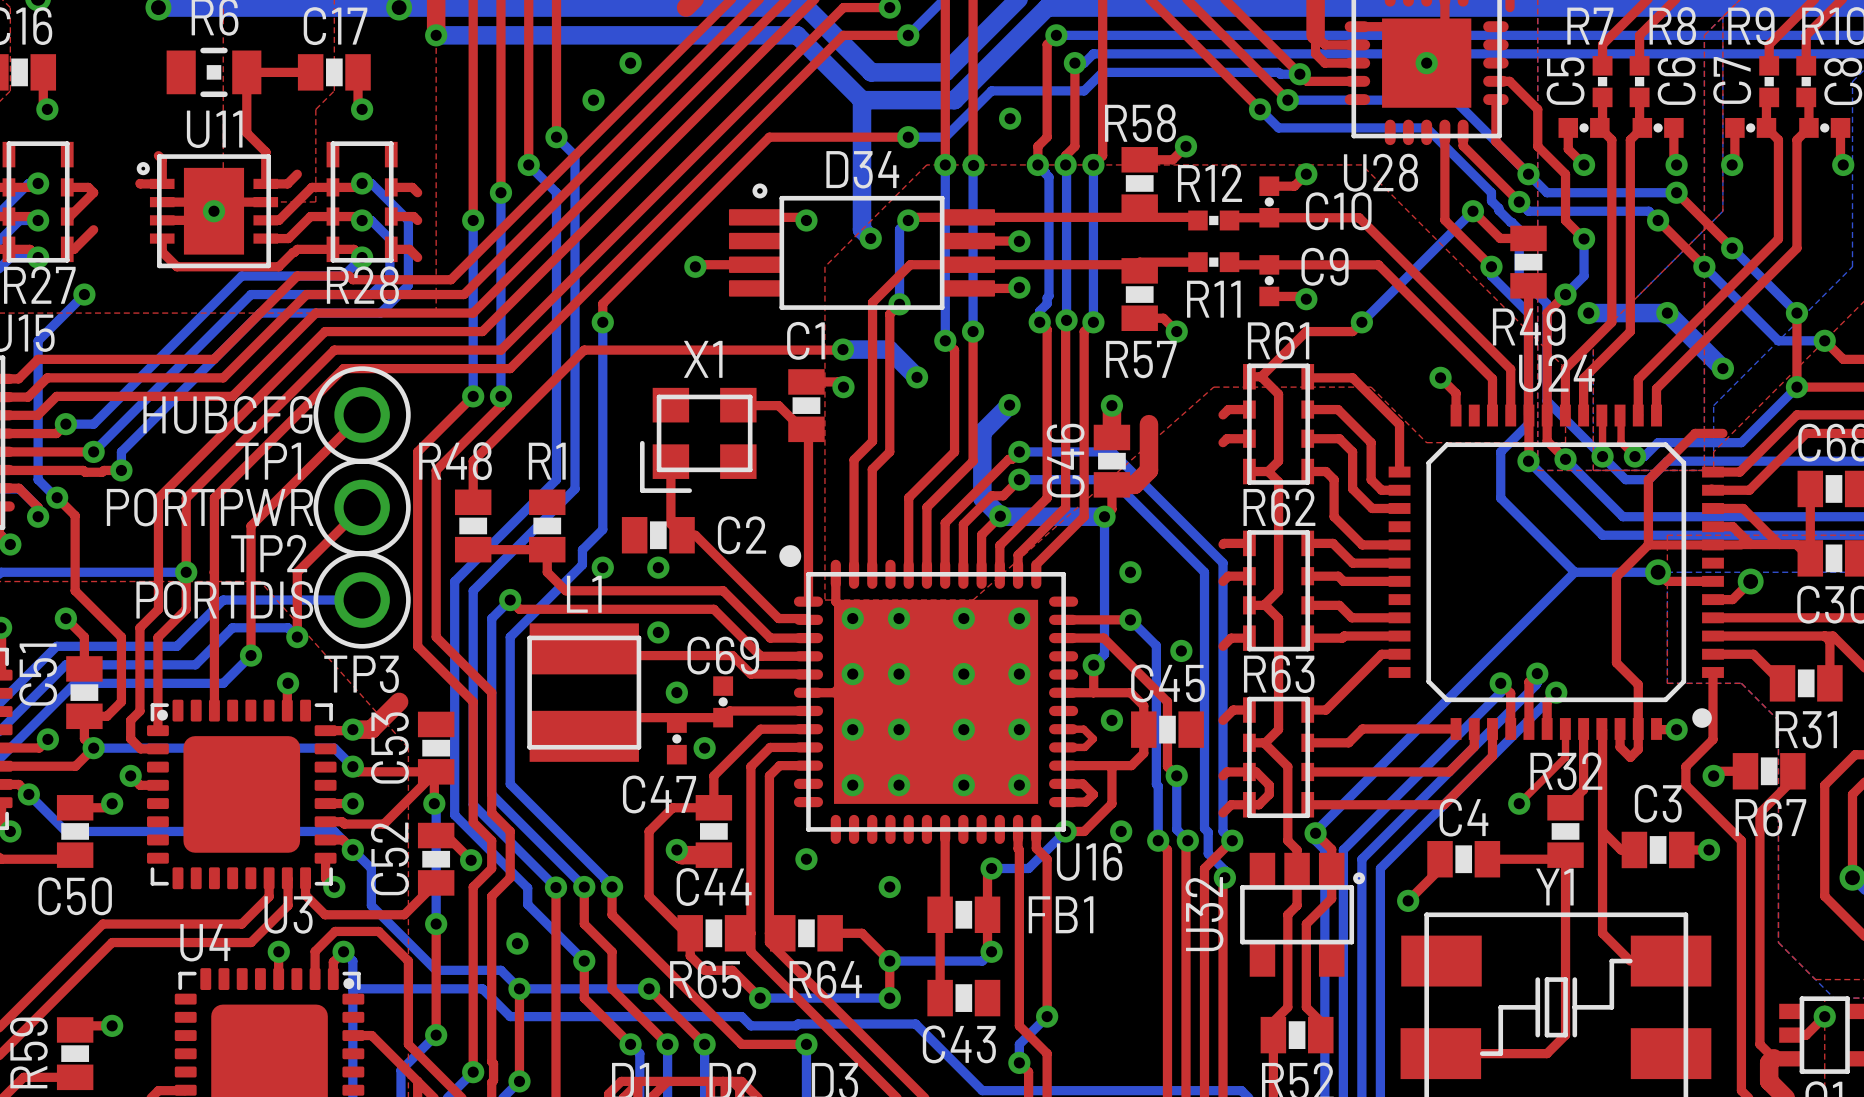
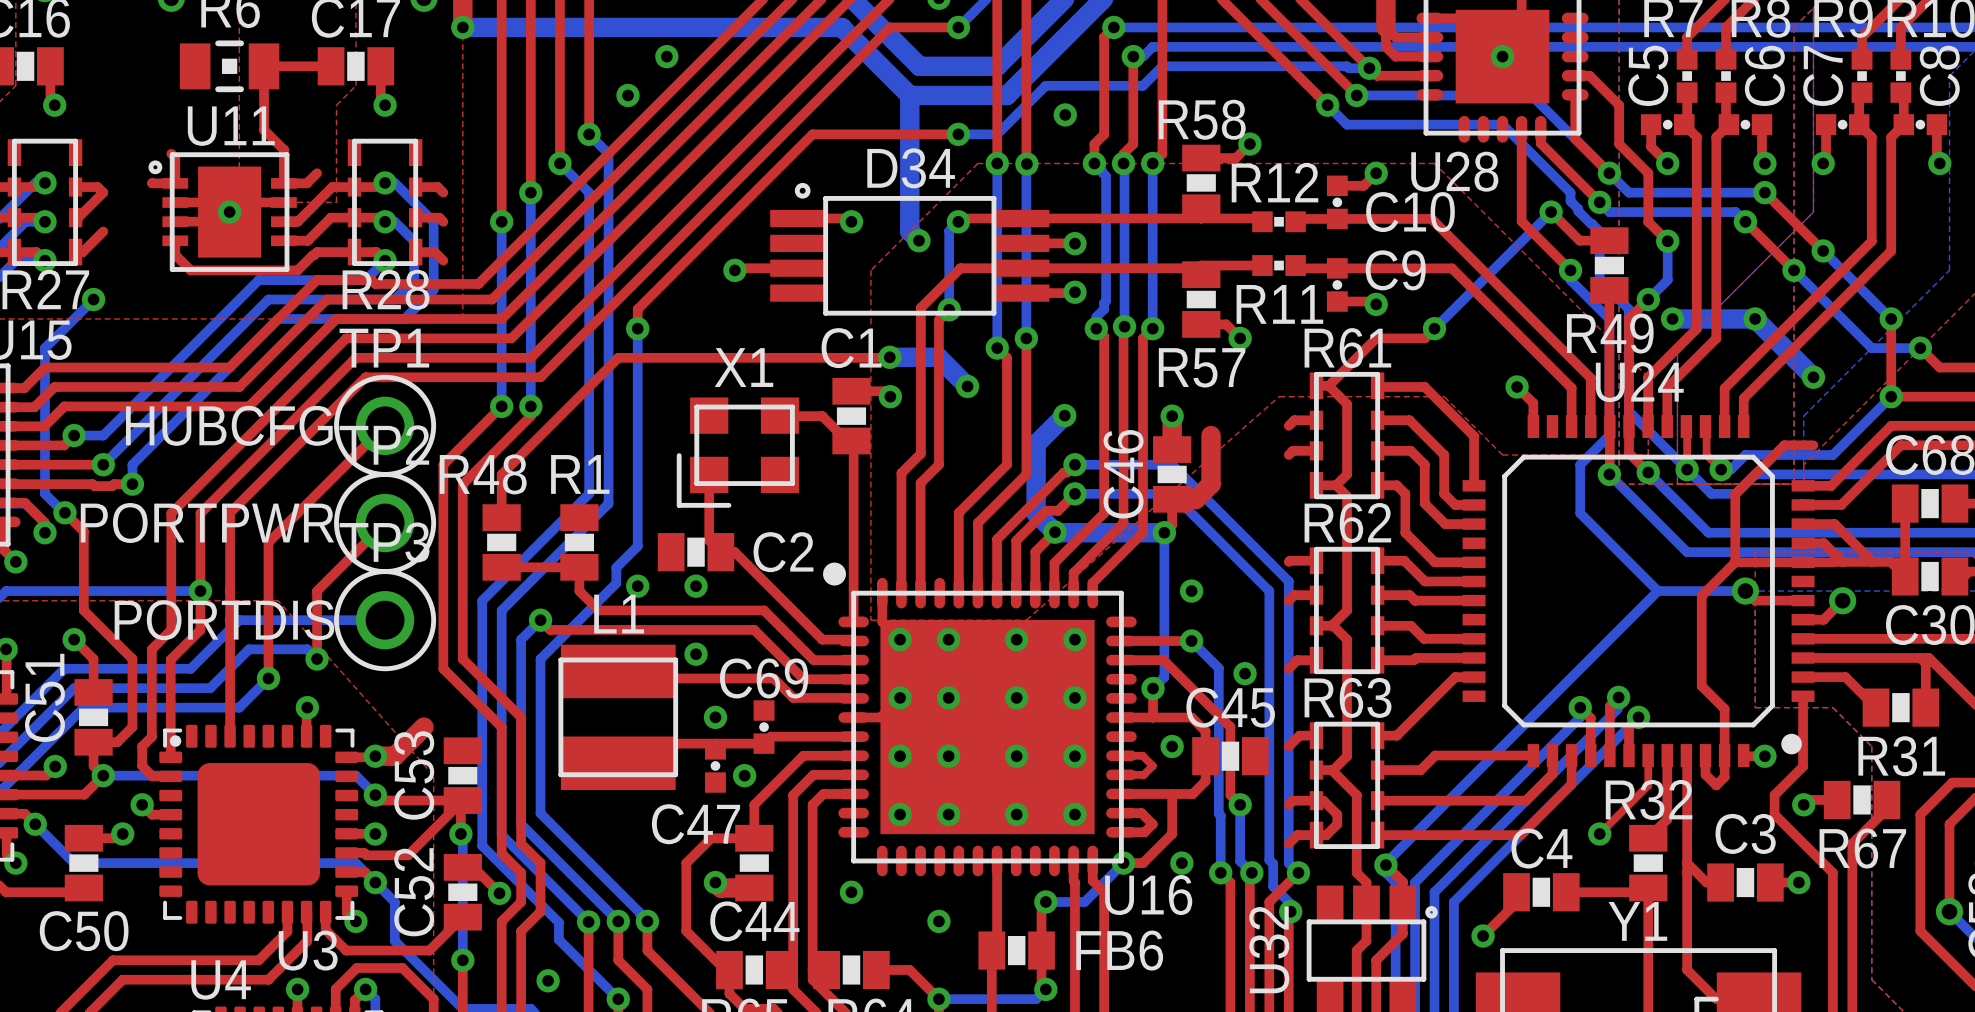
TP1 name position: TP1 (268, 461) -> TP1 (384, 348)
TP2 name position: TP2 (269, 553) -> TP2 (384, 444)
TP3 name position: TP3 (361, 674) -> TP3 (384, 542)
FB1 name: FB1 (1061, 914) -> FB6 (1119, 950)

